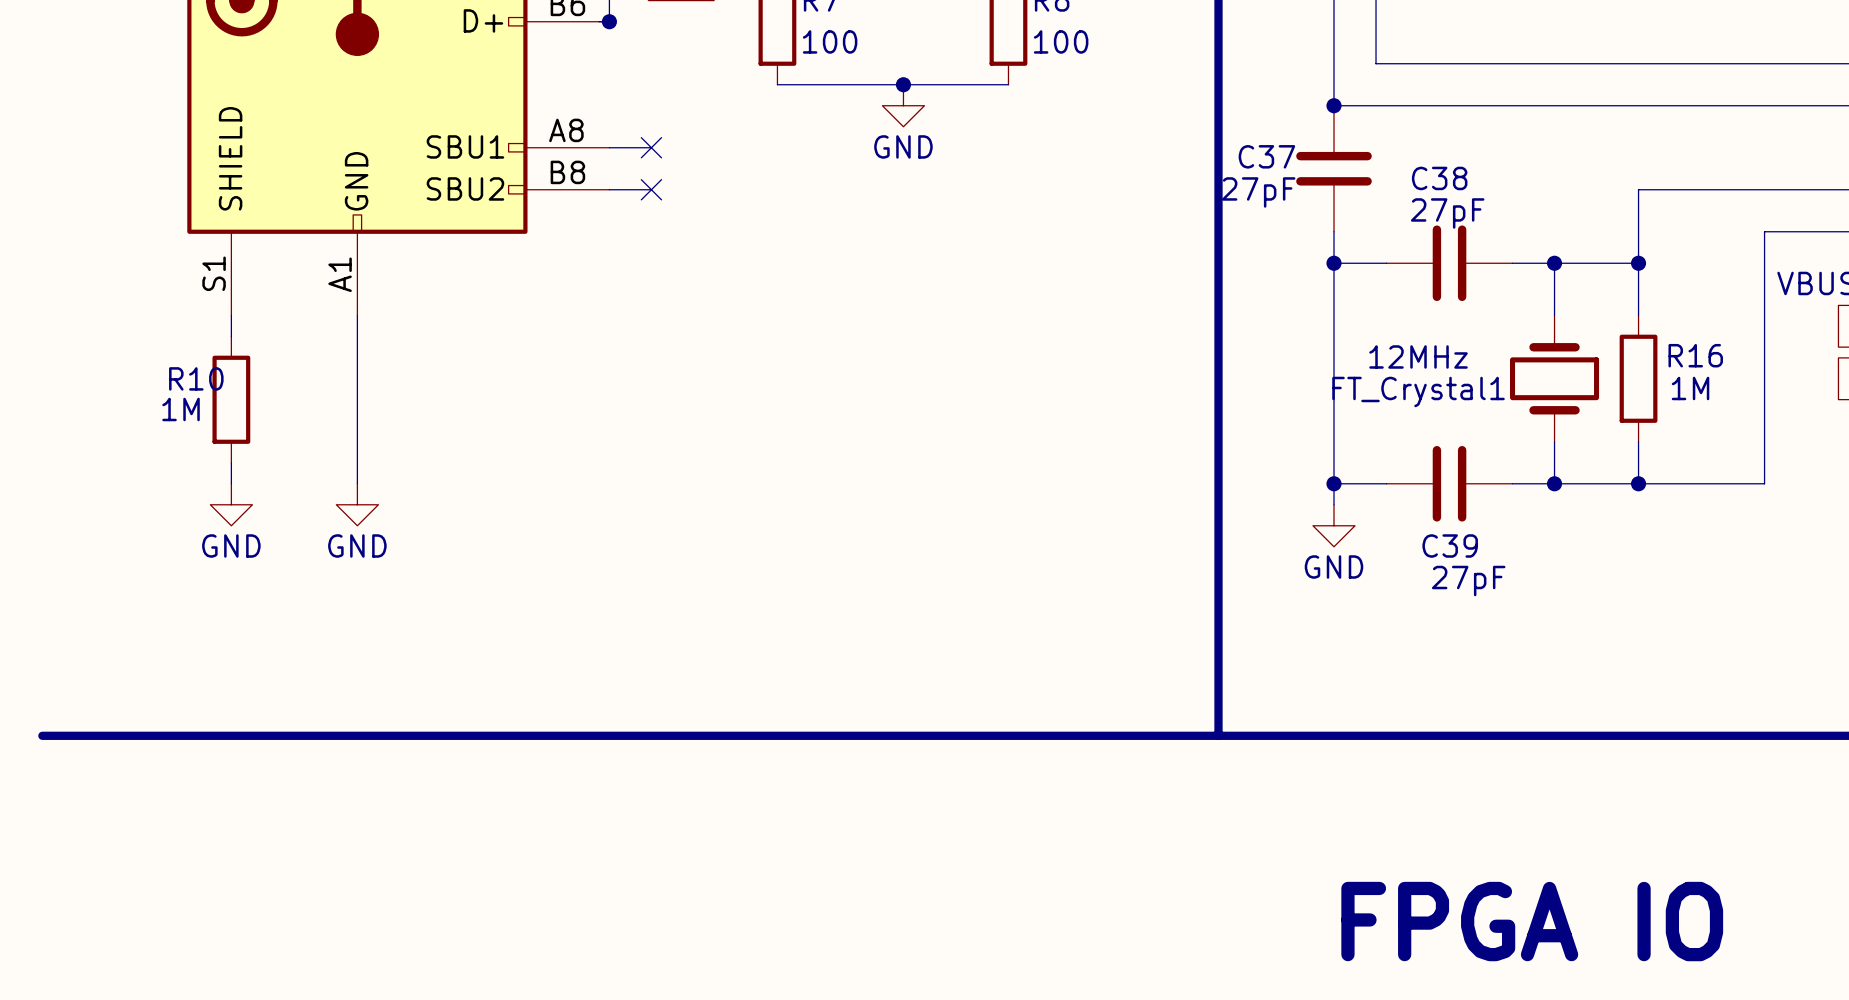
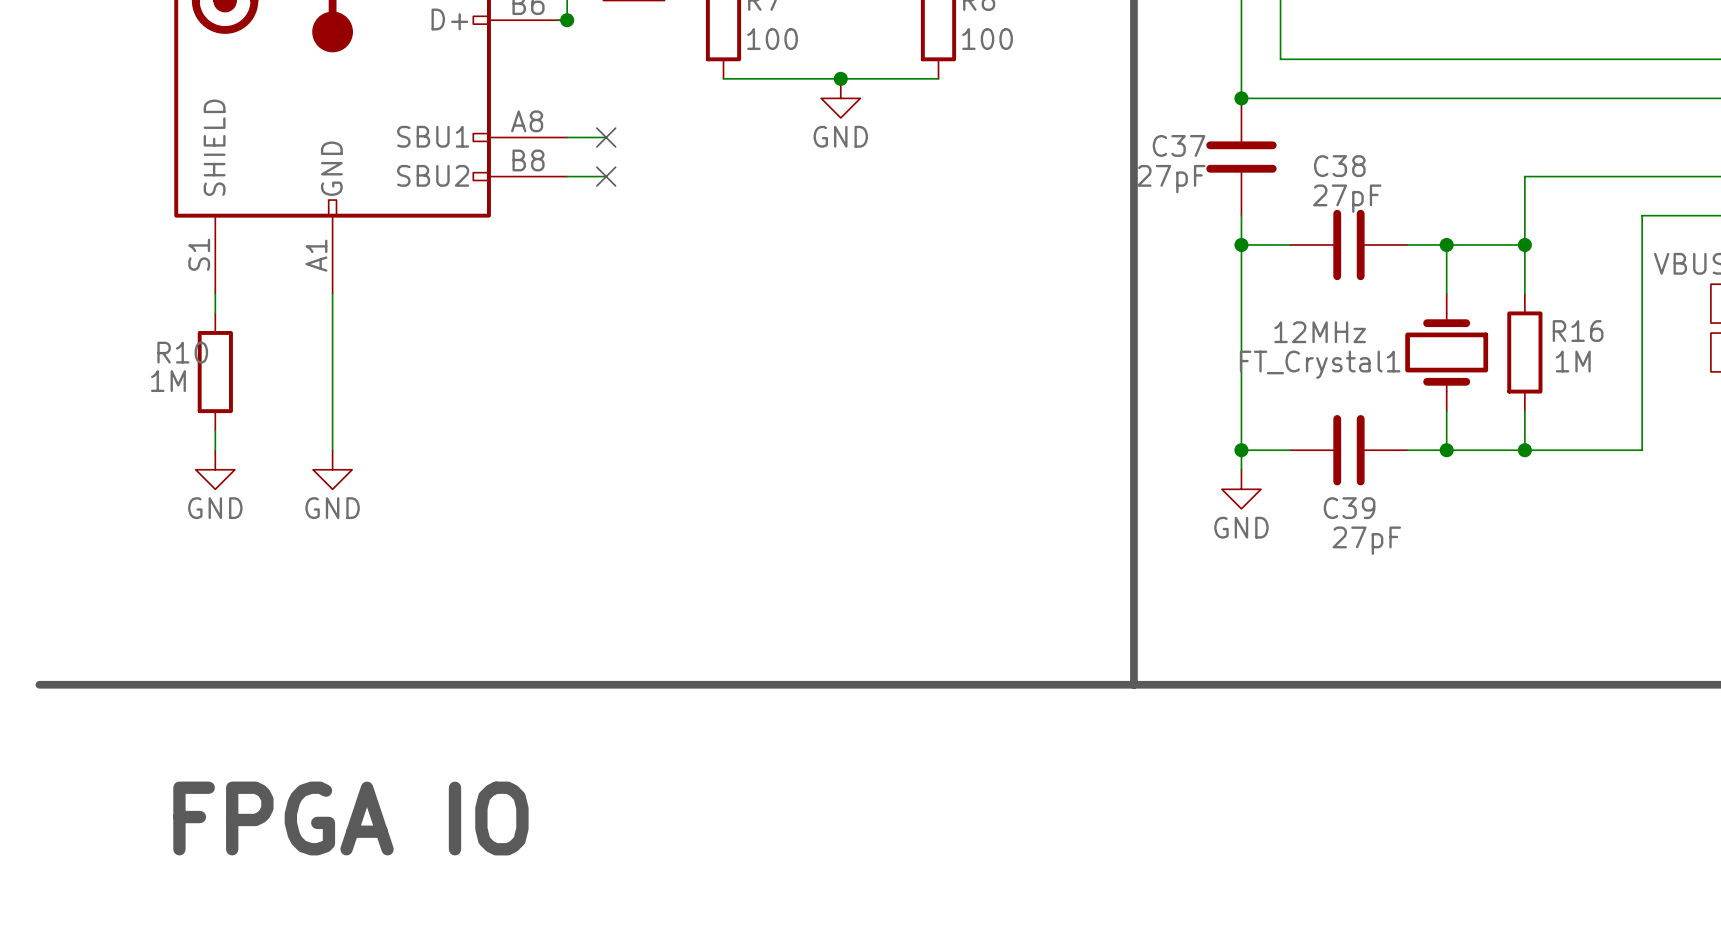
text: none -> FPGA IO (350, 818)
text: FPGA IO (1532, 921) -> none

